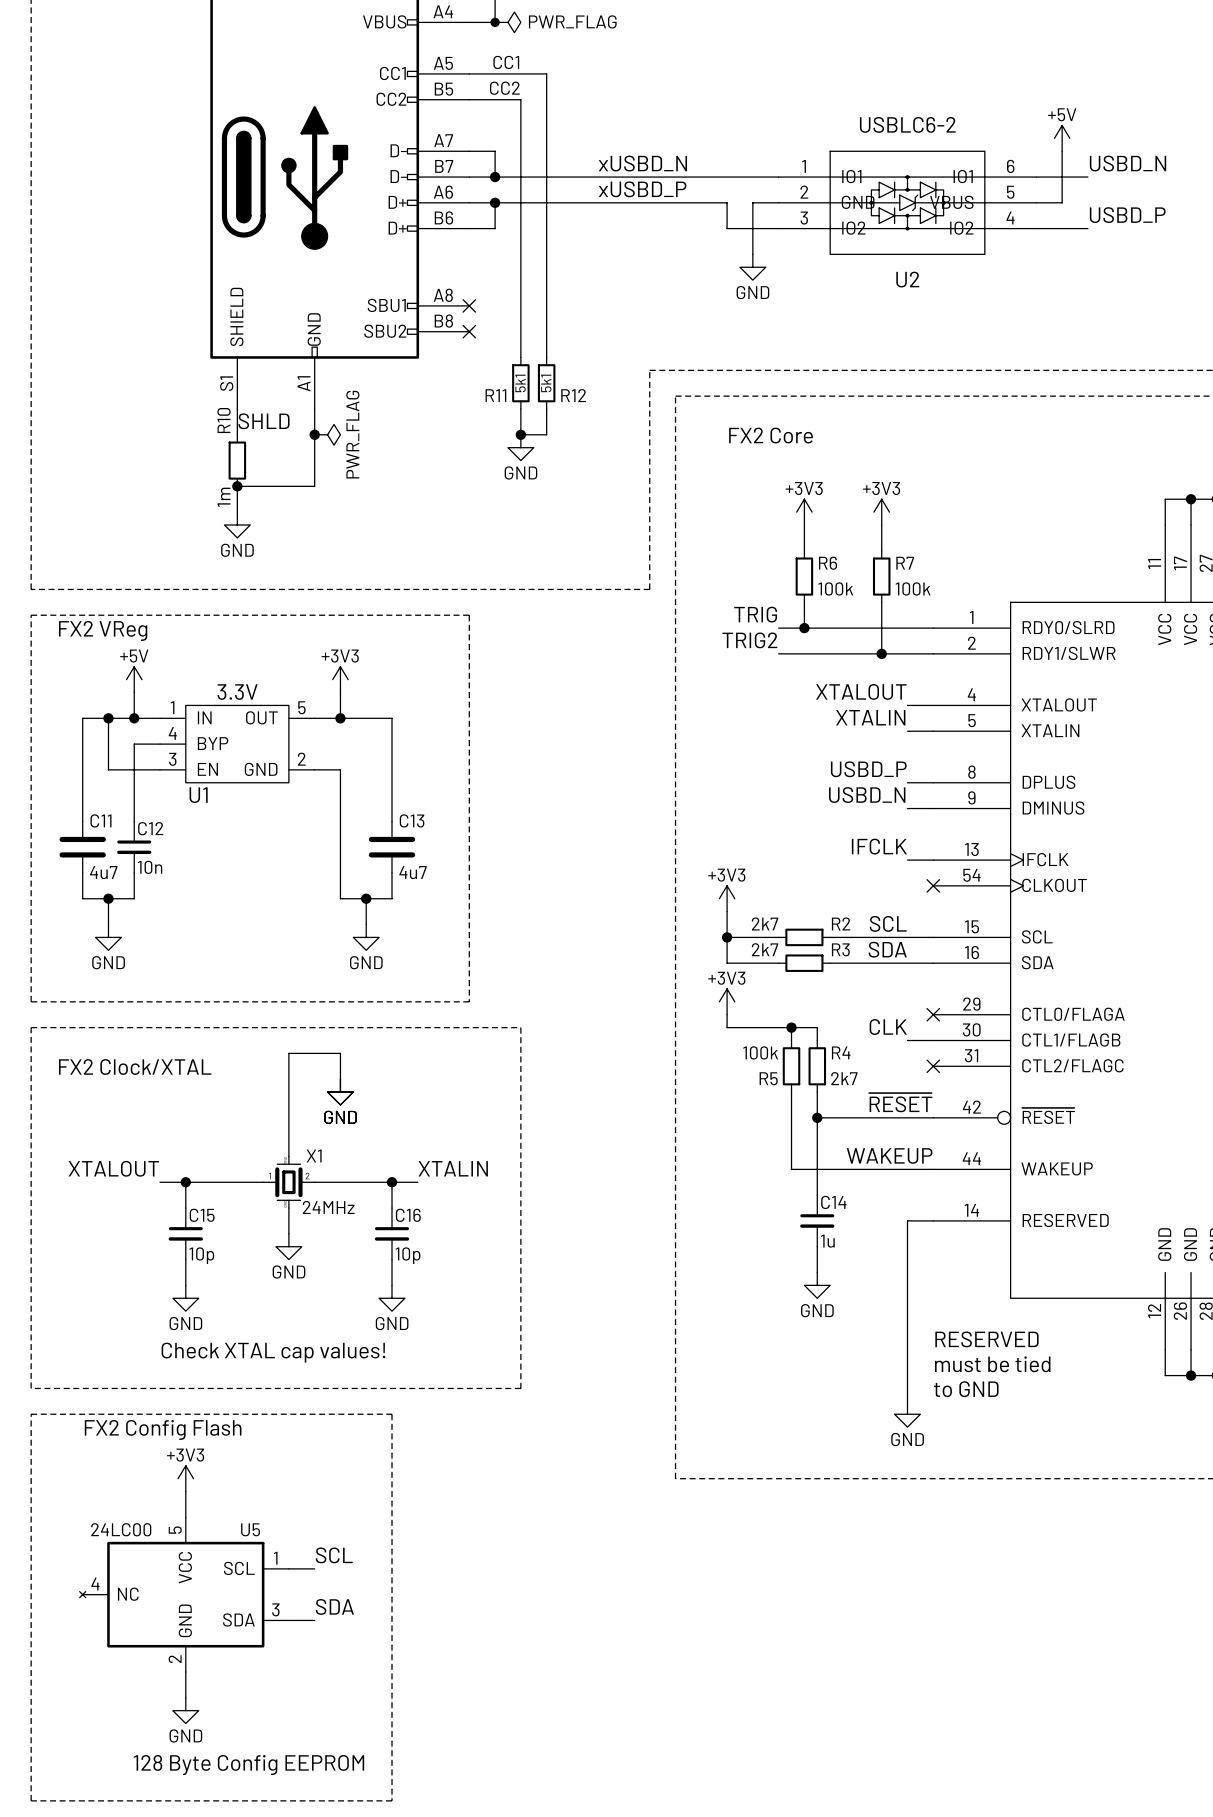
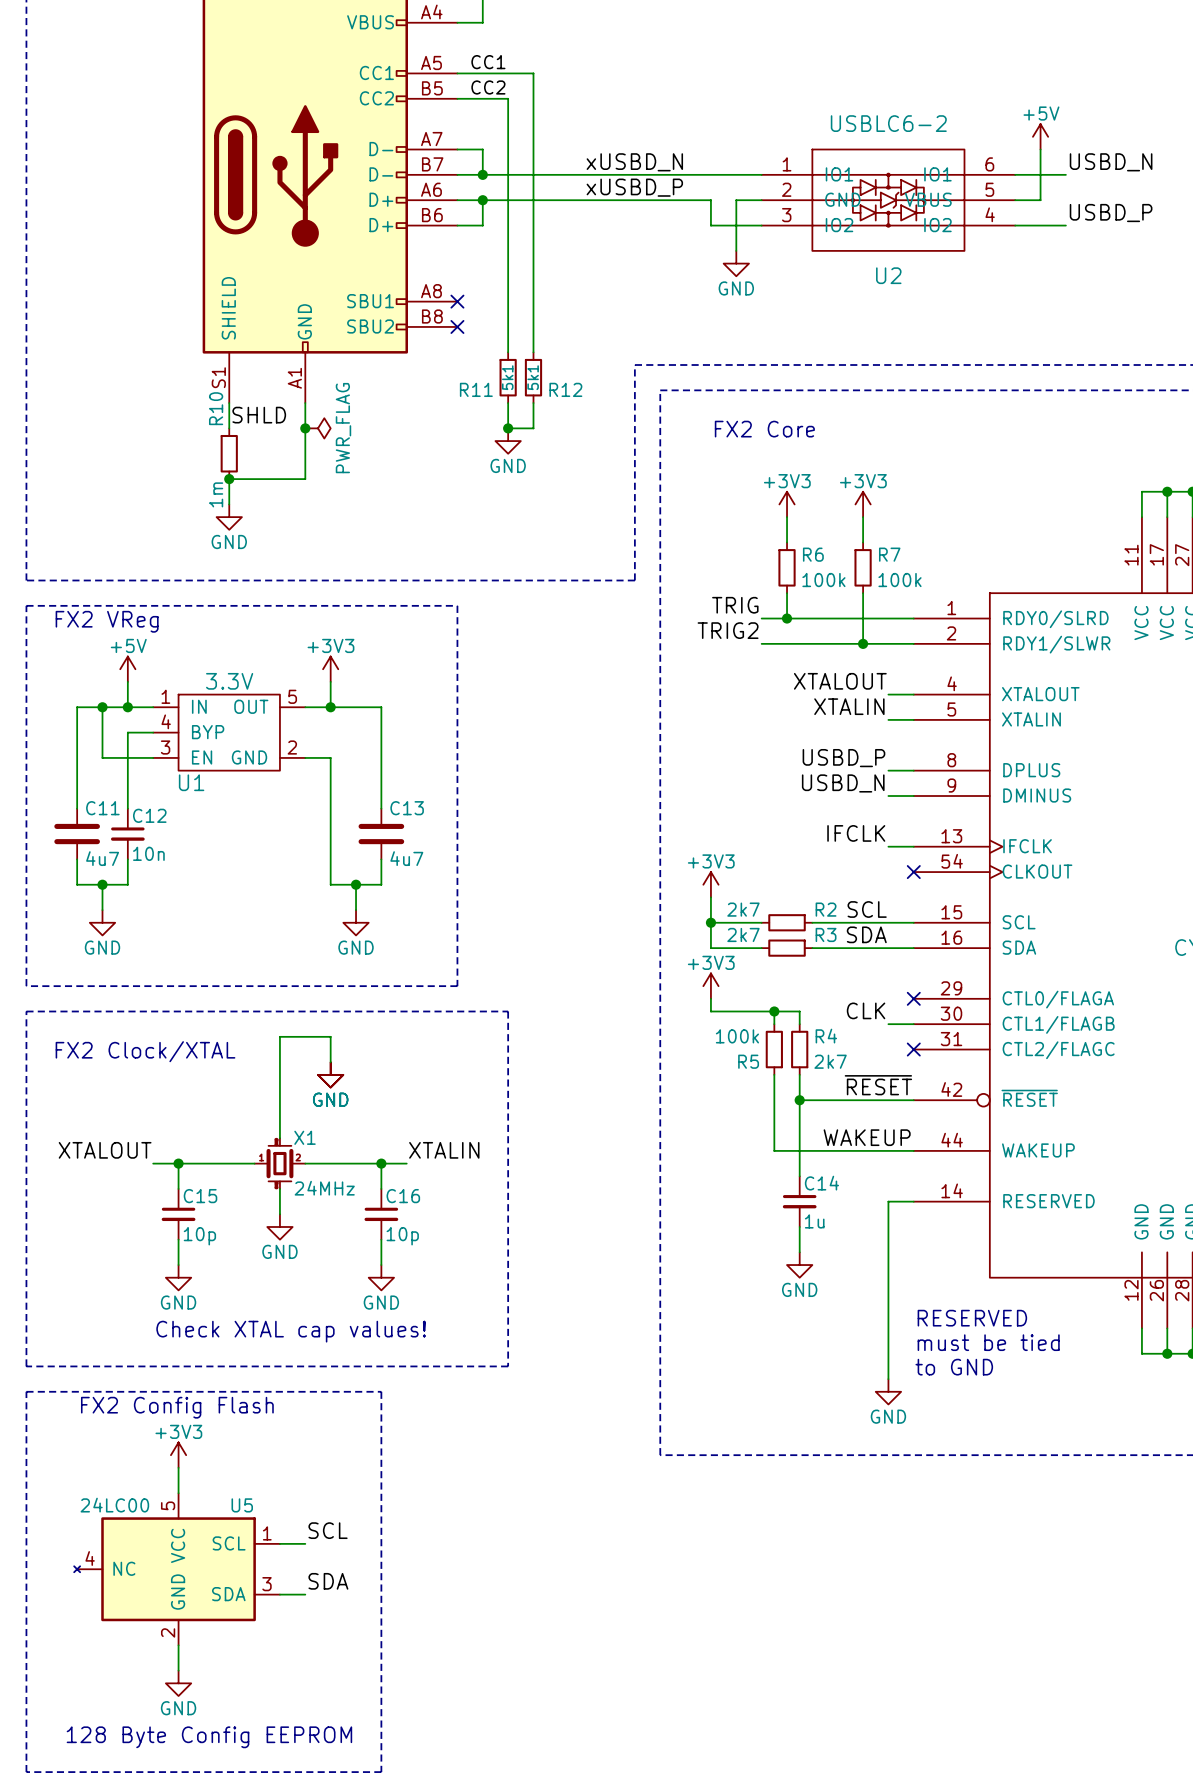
junction: (495, 22) -> none
power symbol: PWR_FLAG (507, 22) -> none

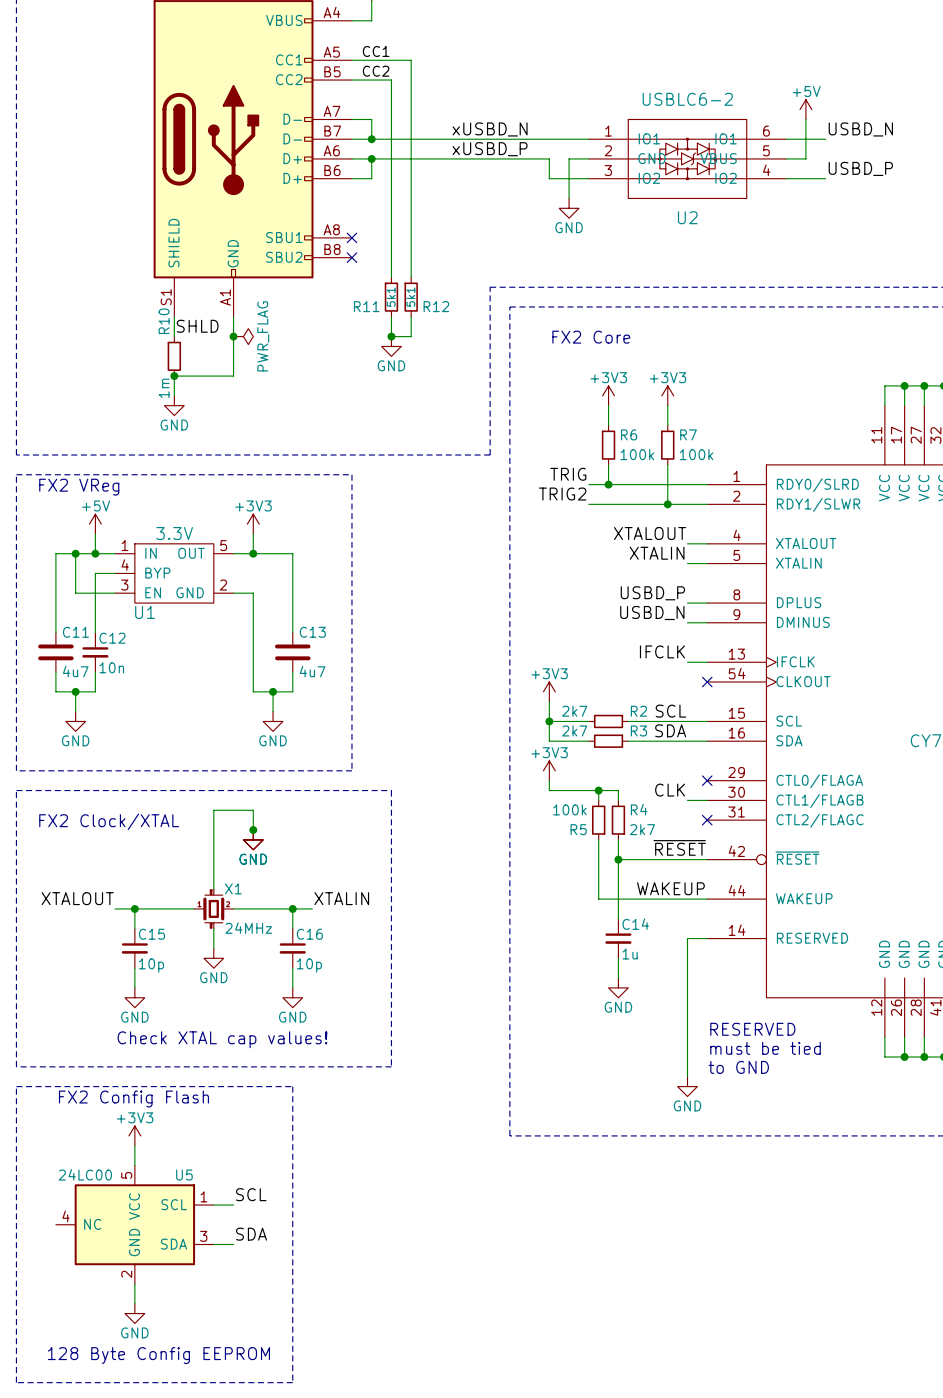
junction: none -> (253, 830)
U5 symbol: [74, 1493, 280, 1646] -> [55, 1165, 214, 1284]

